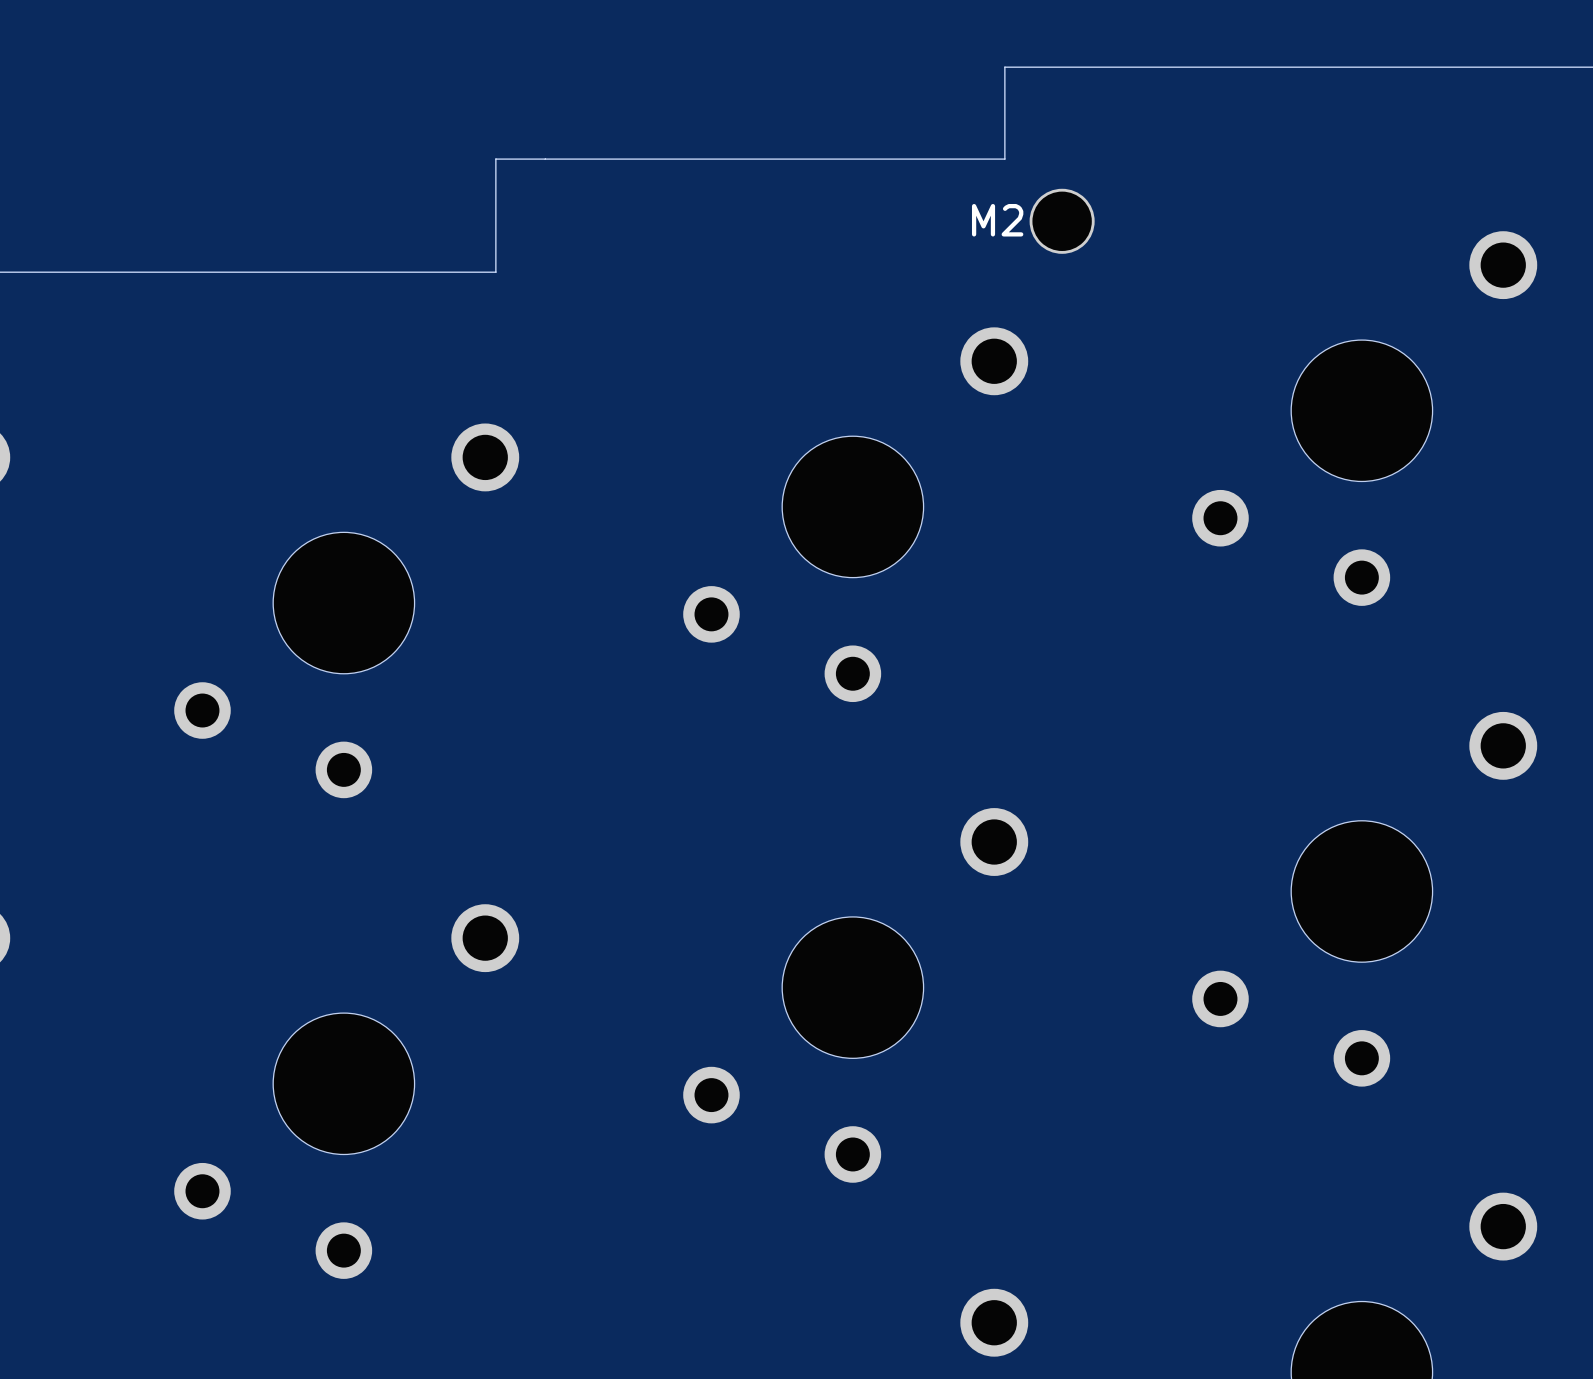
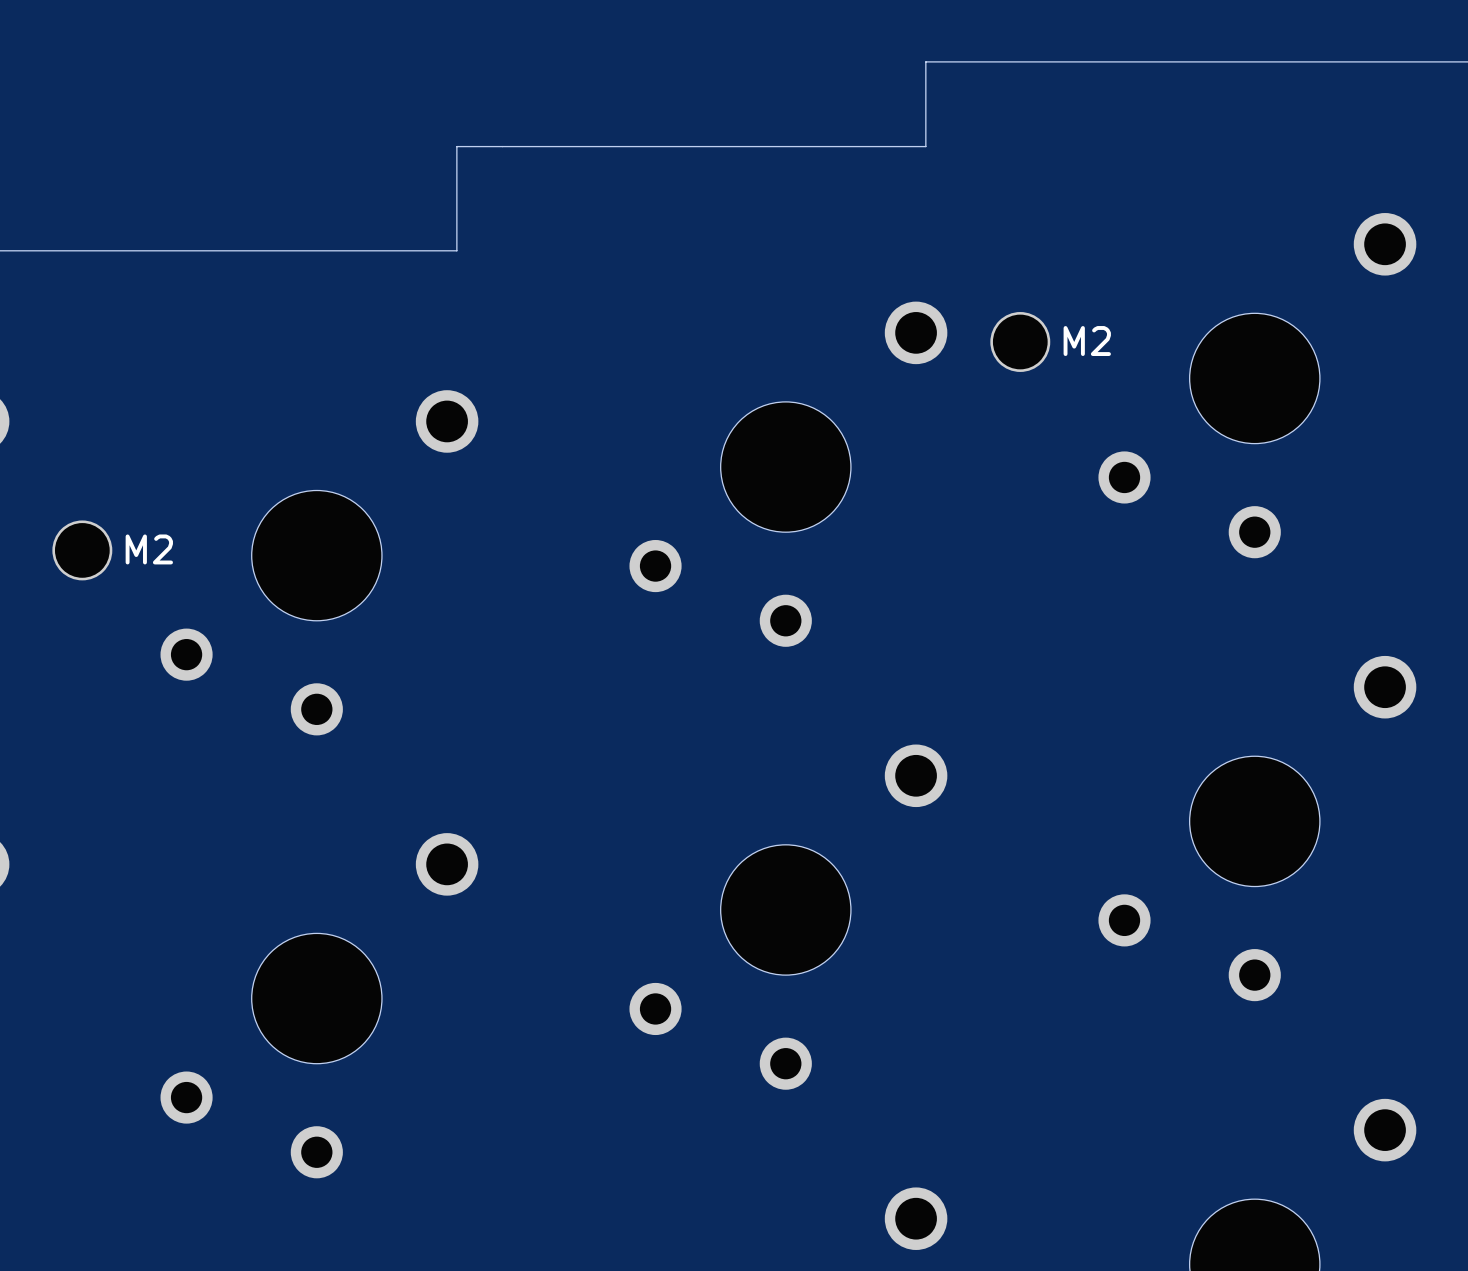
part: (1062, 221) -> none
part: none -> (1020, 341)
part: none -> (82, 550)

